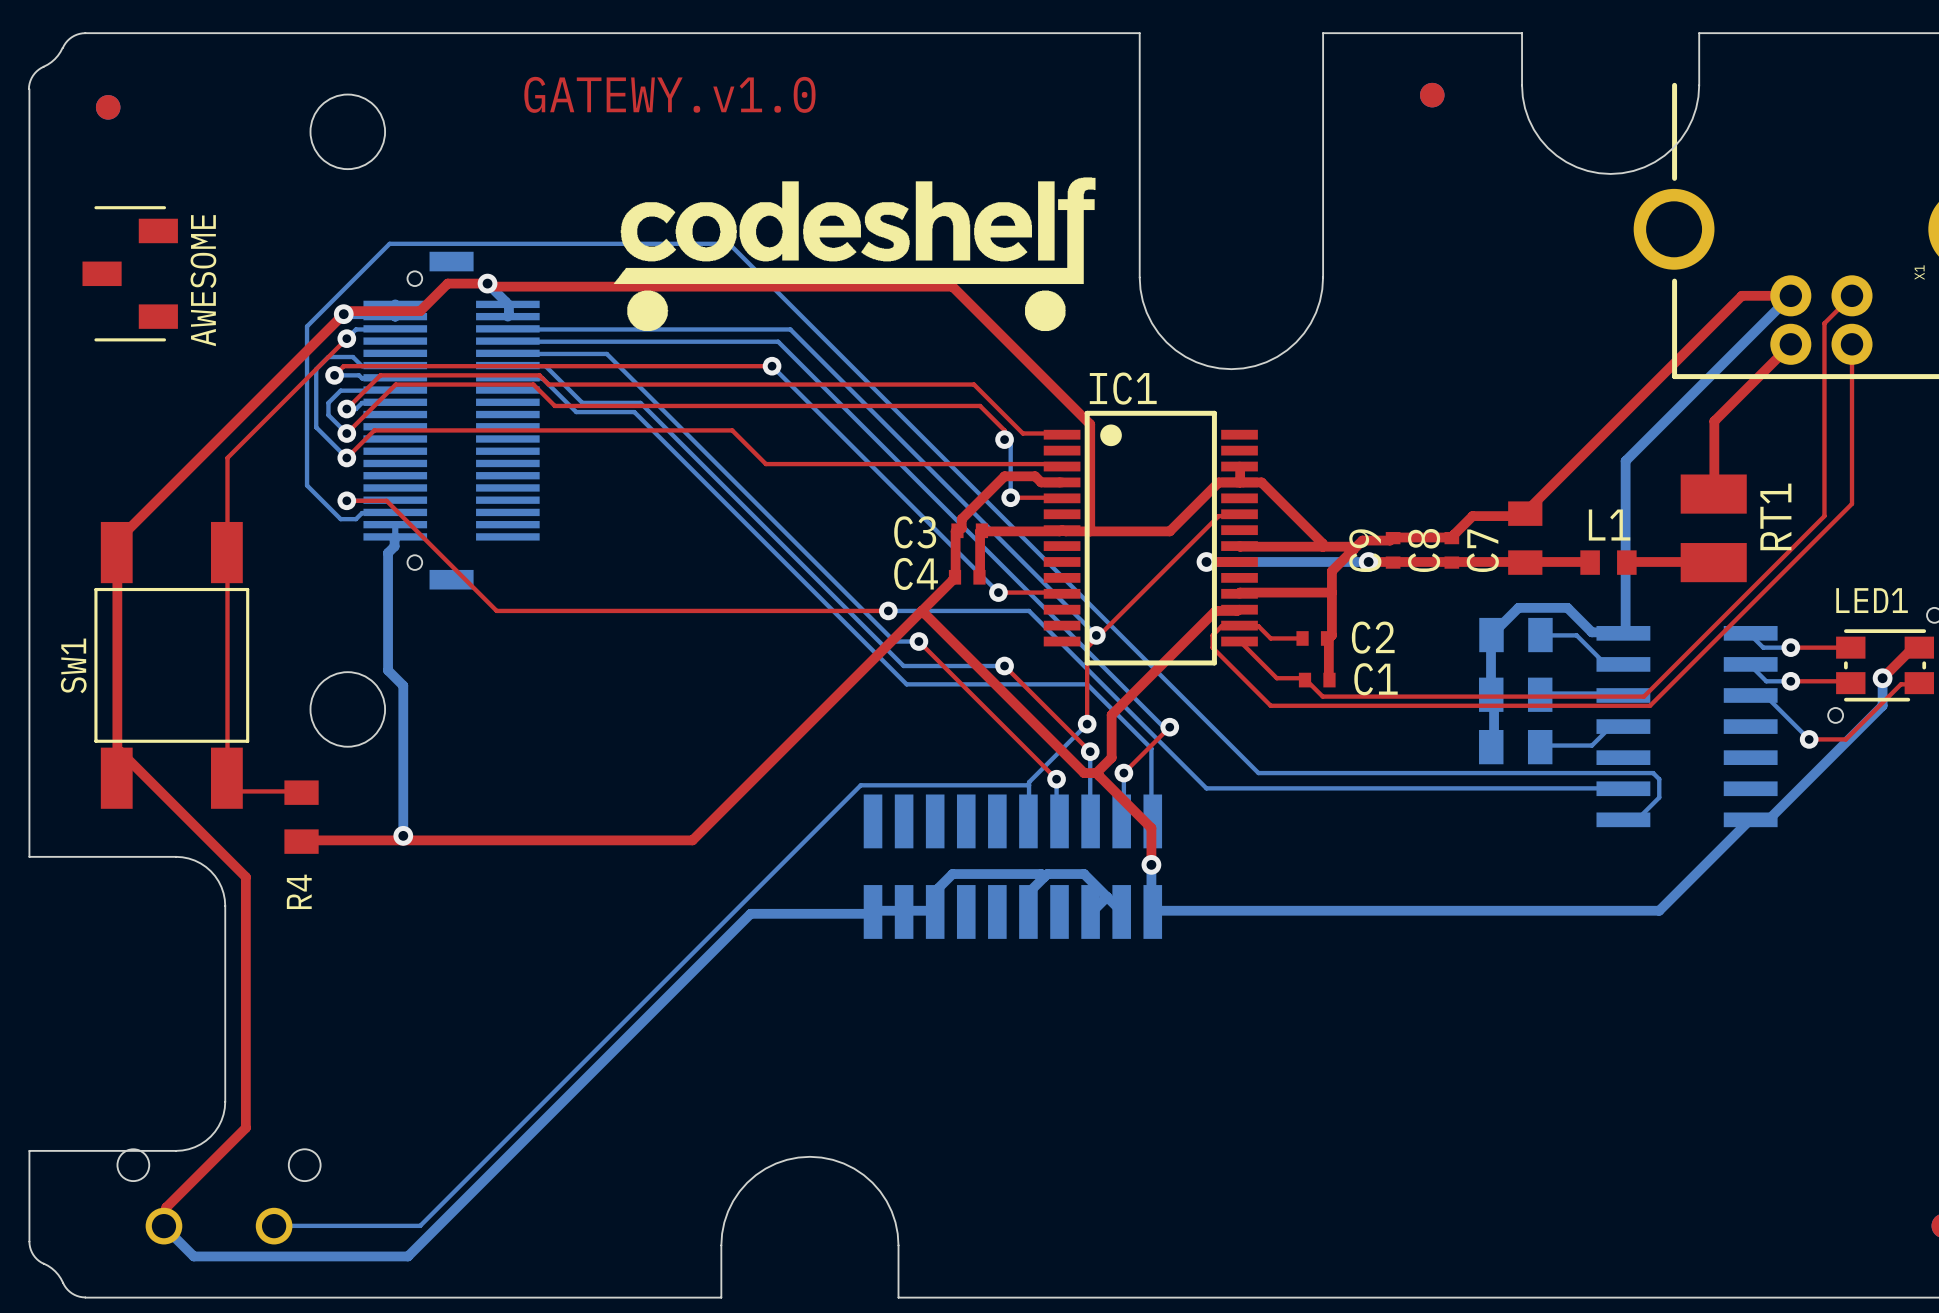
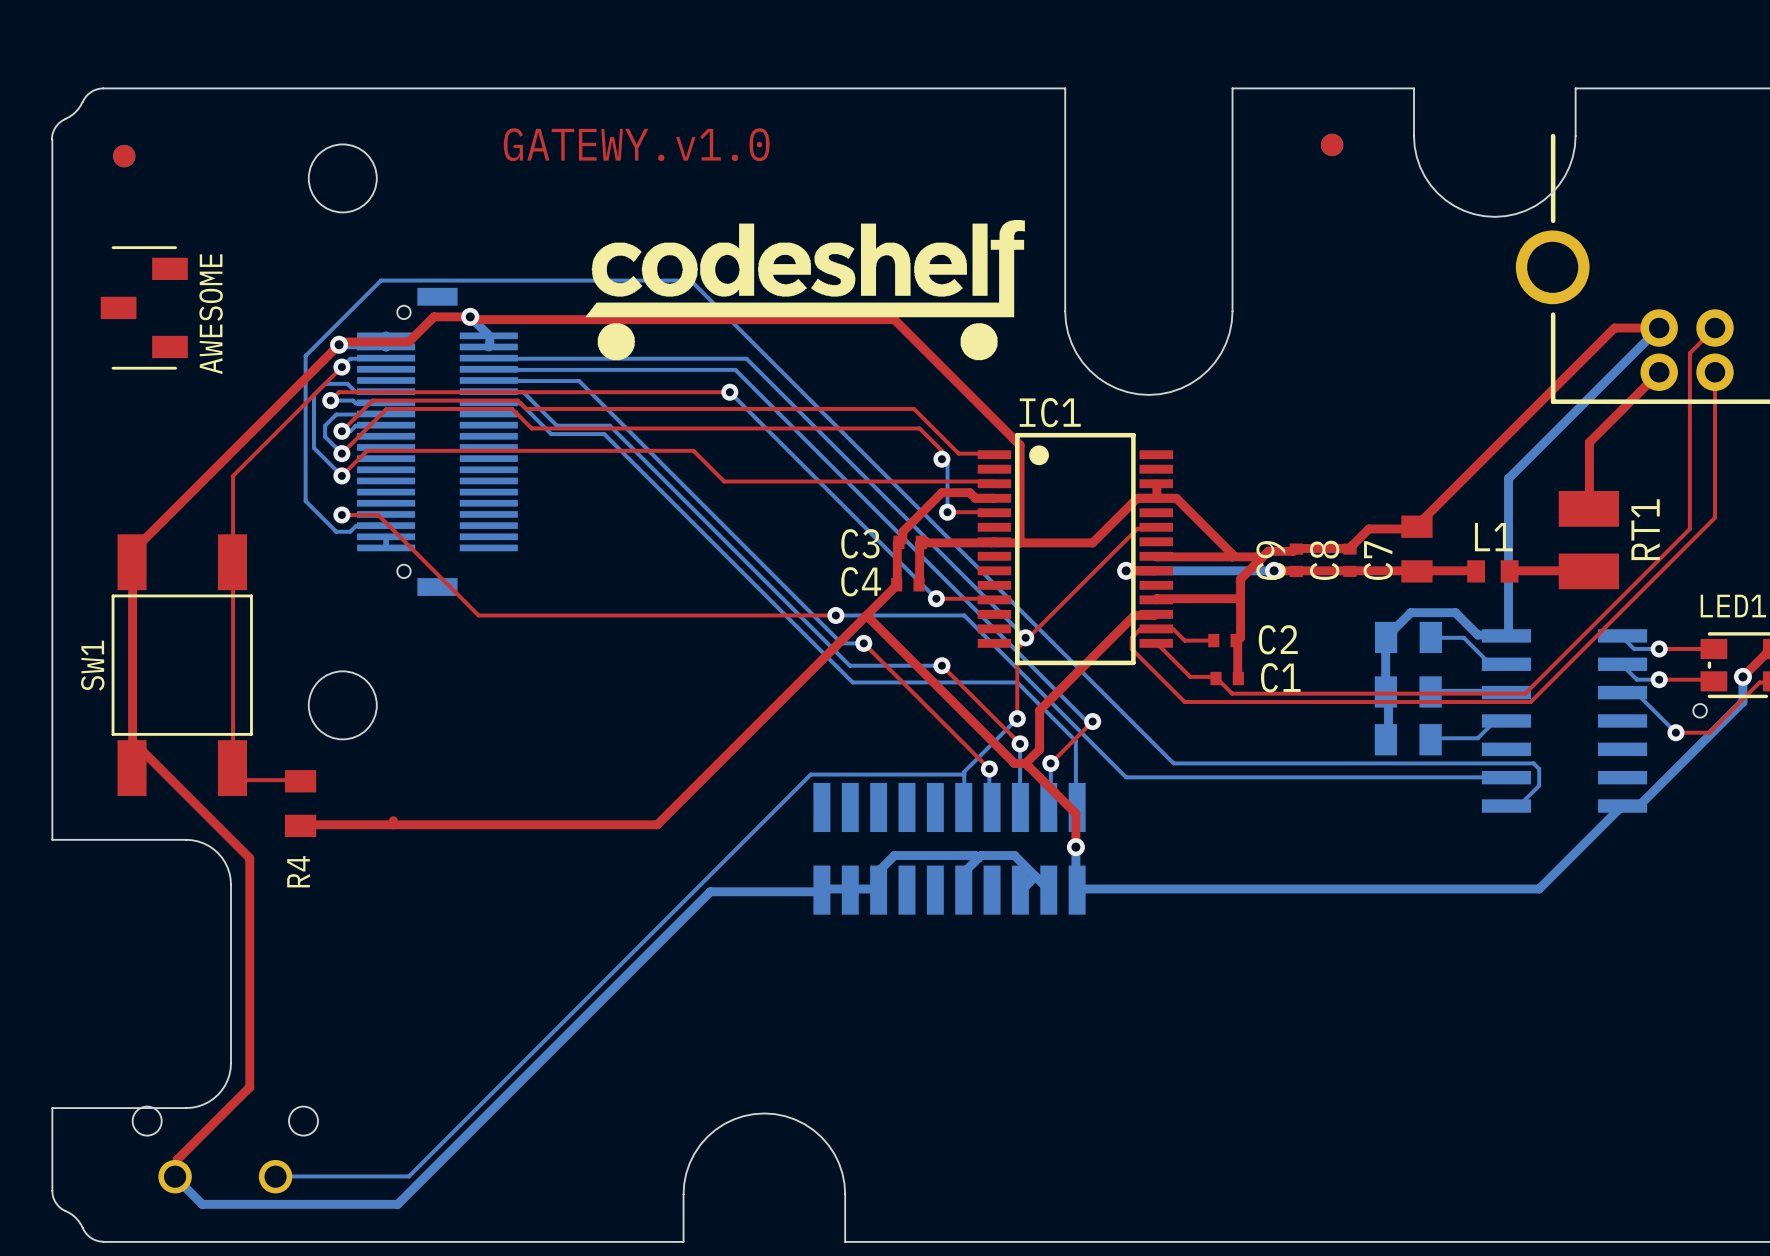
bottom track: (395, 536) (394, 546) (388, 552) (388, 670) (403, 685) (403, 835) -> none
via: (403, 835) -> none

